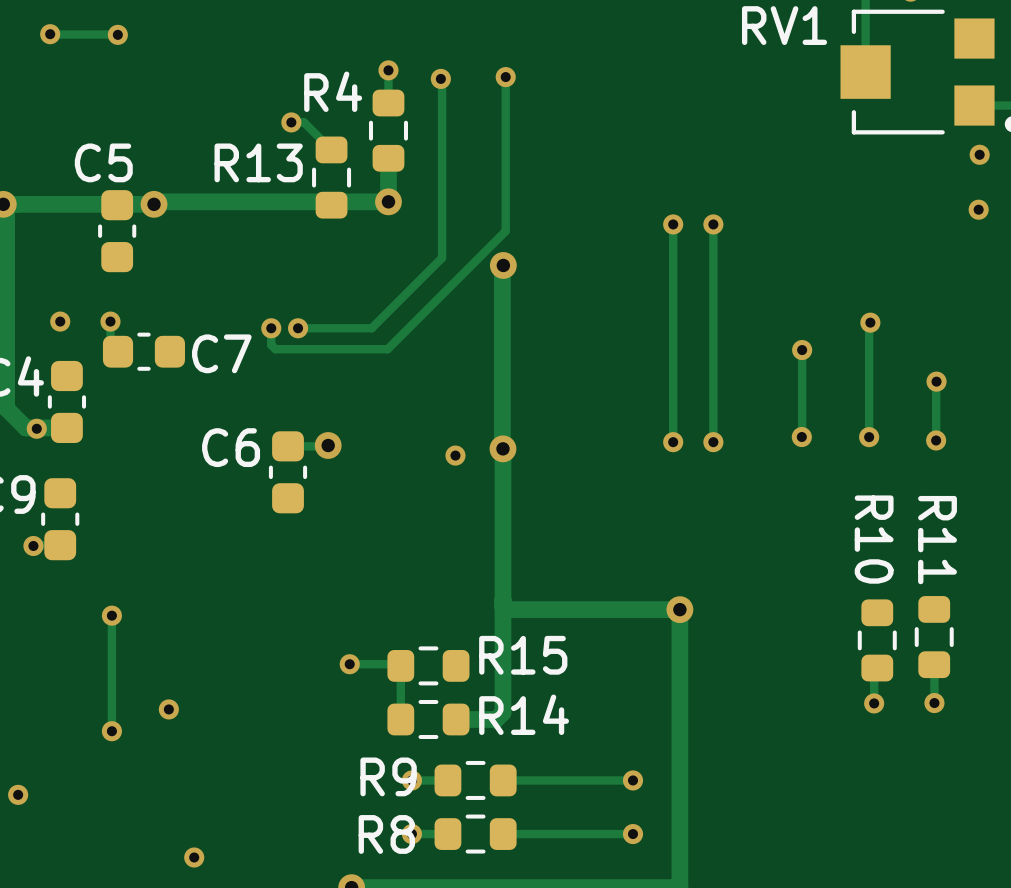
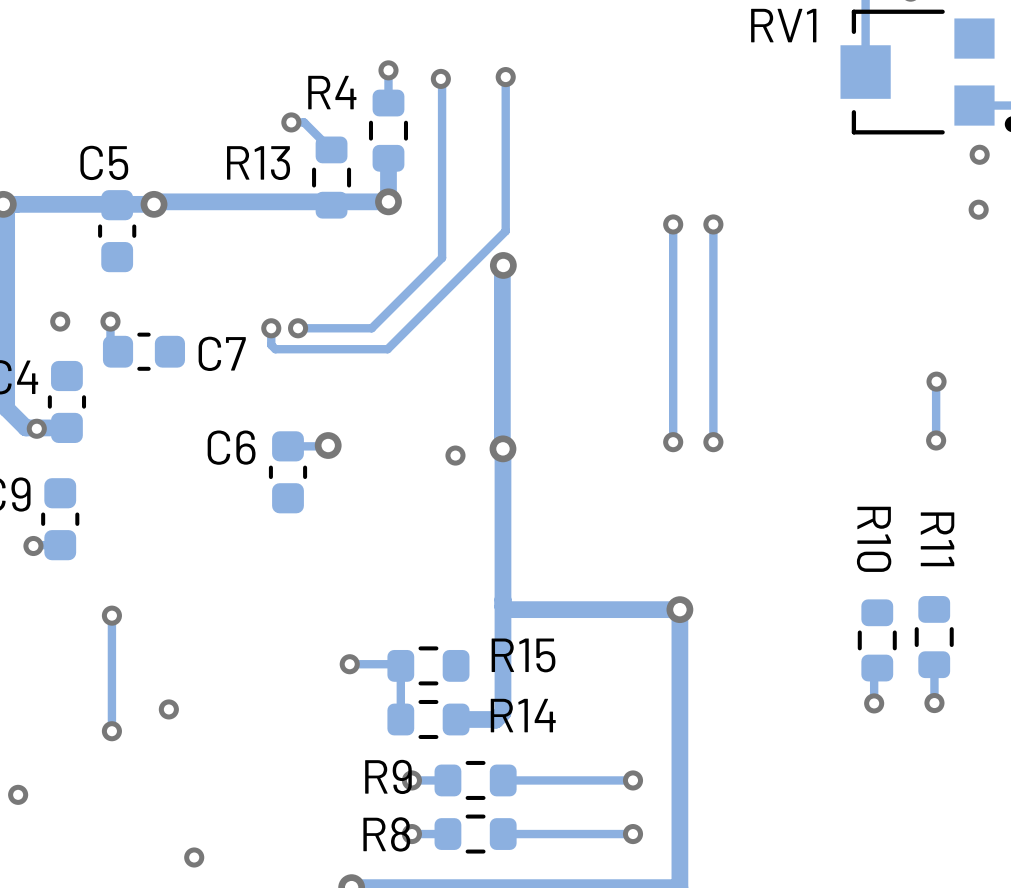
track: (49, 34) (118, 35) -> none
via: (50, 34) -> none
via: (117, 34) -> none
track: (870, 321) (869, 323) (869, 437) -> none
via: (870, 322) -> none
track: (802, 350) (802, 436) -> none
via: (802, 350) -> none
via: (801, 437) -> none
via: (869, 437) -> none

